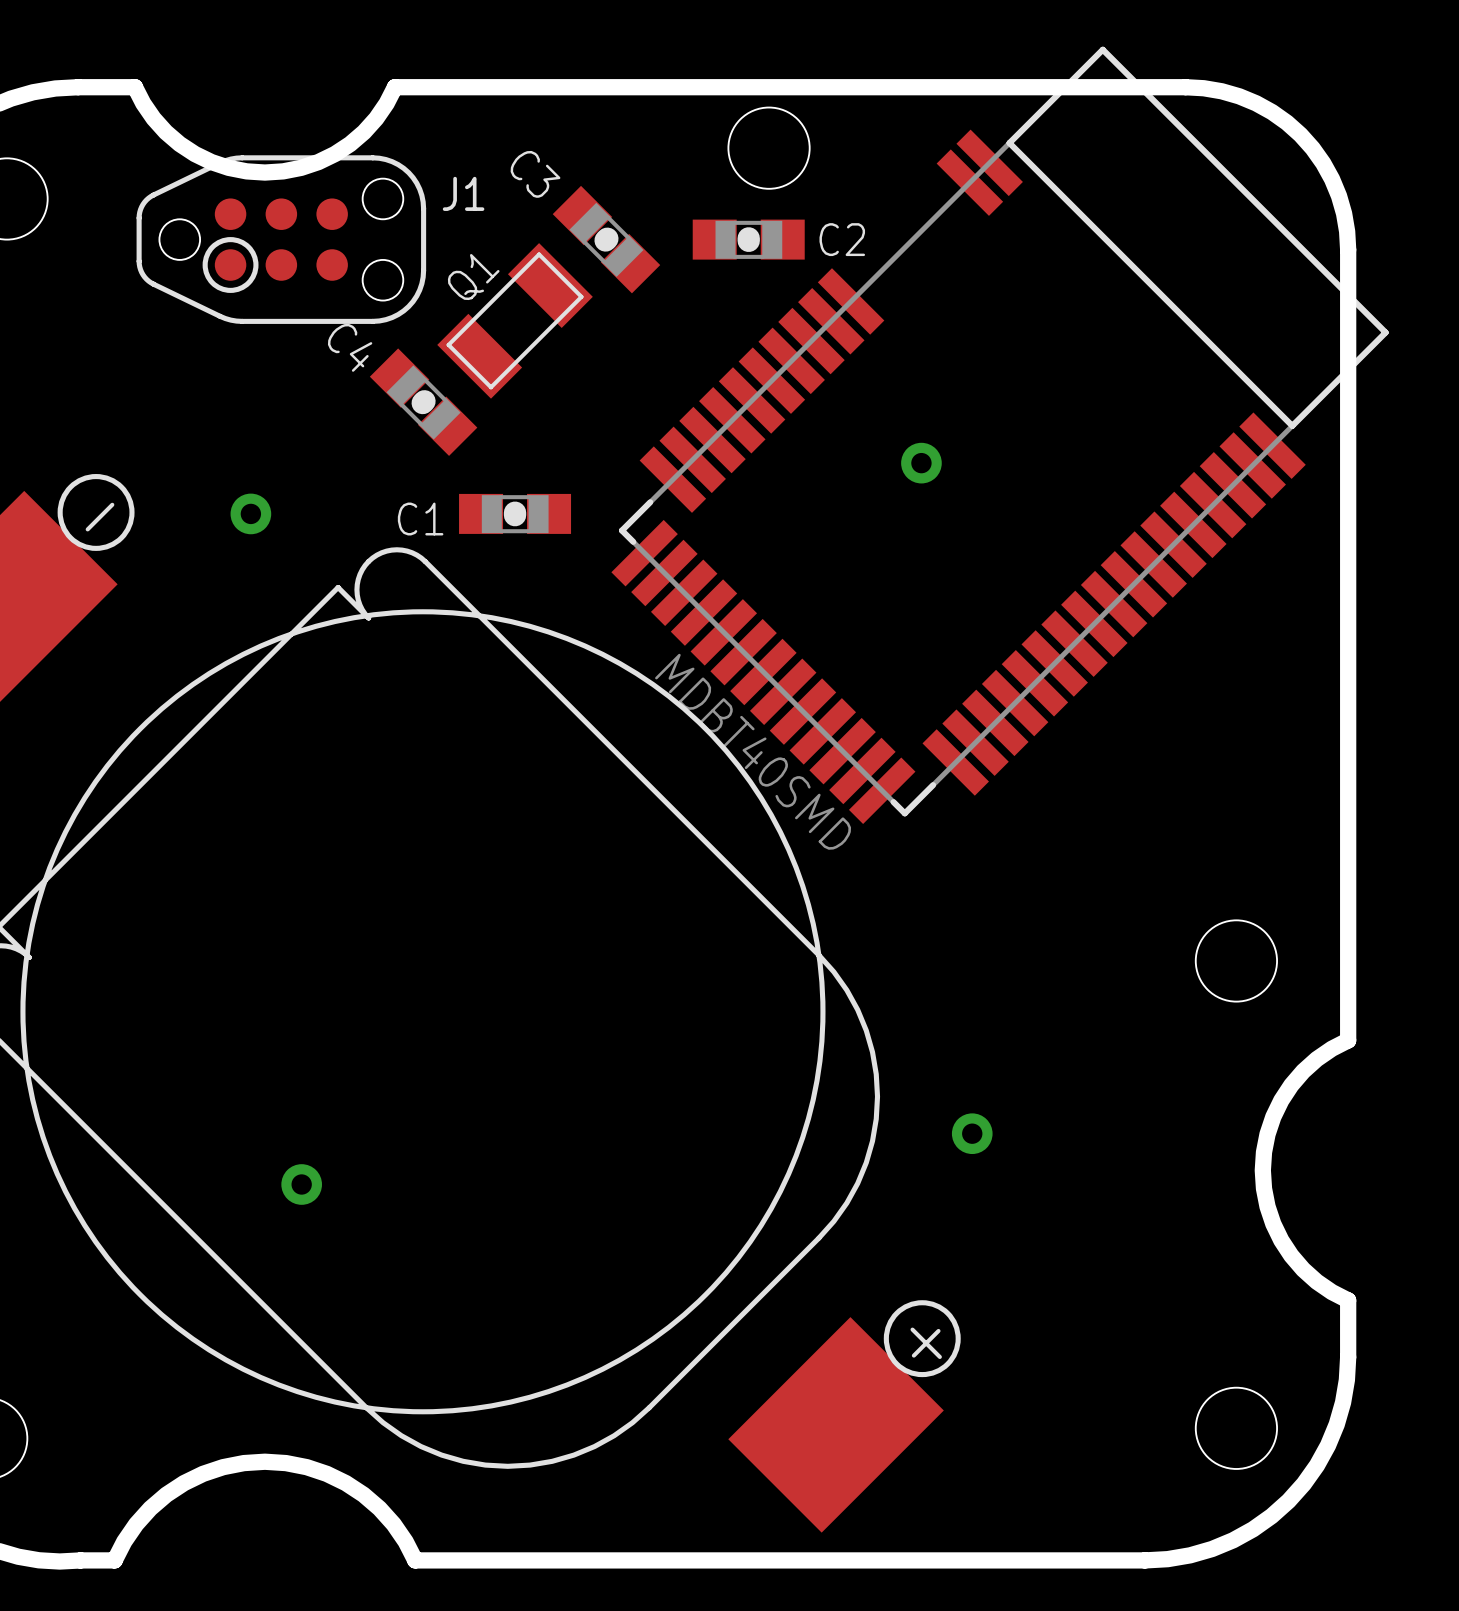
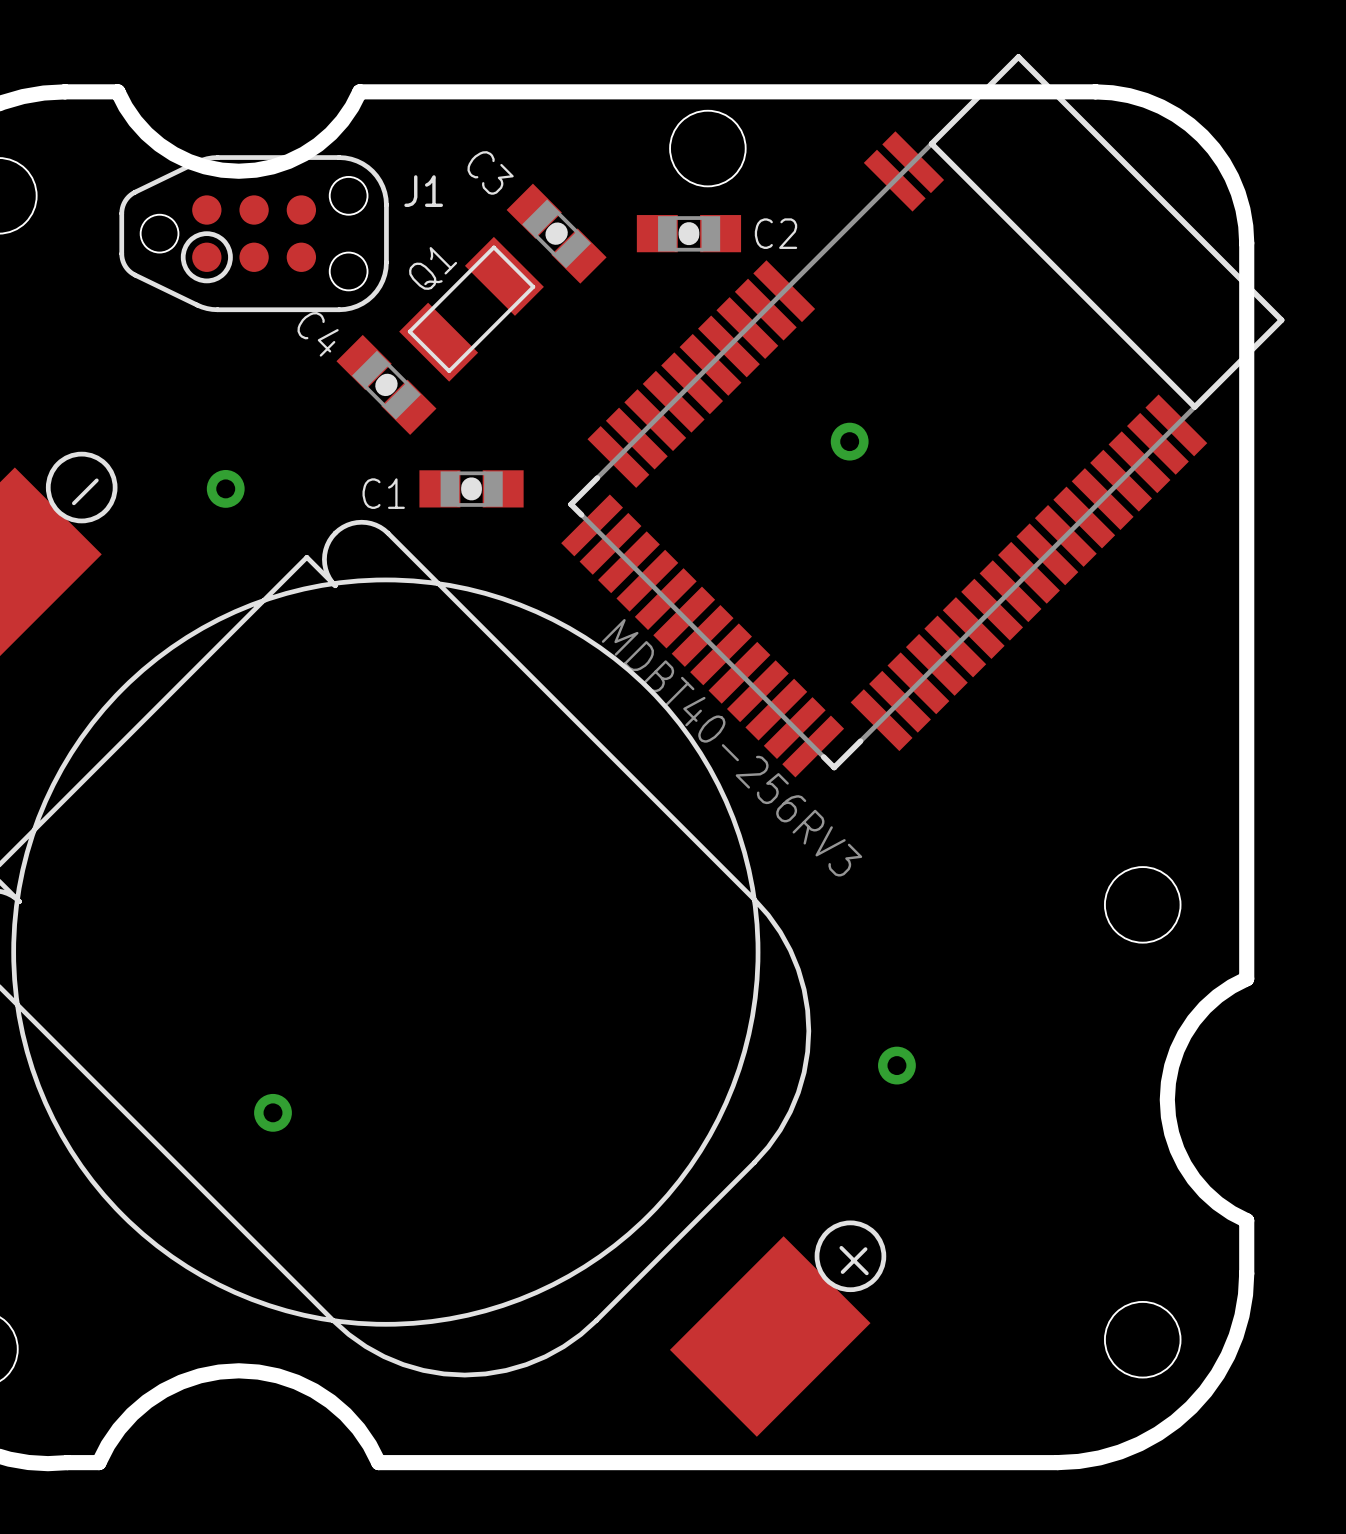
part value: MDBT40SMD (753, 751) -> MDBT40-256RV3 (732, 747)

